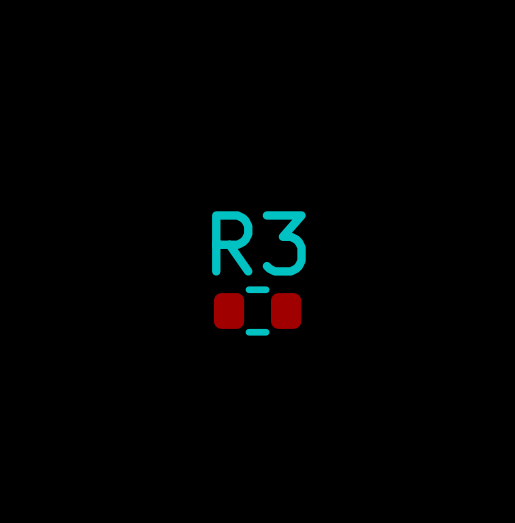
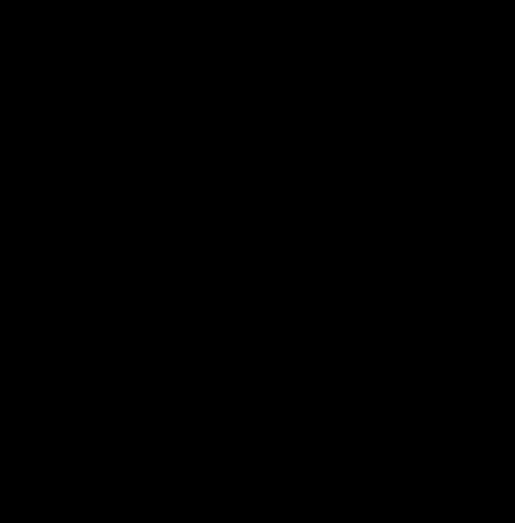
R3: (257, 310) -> none

